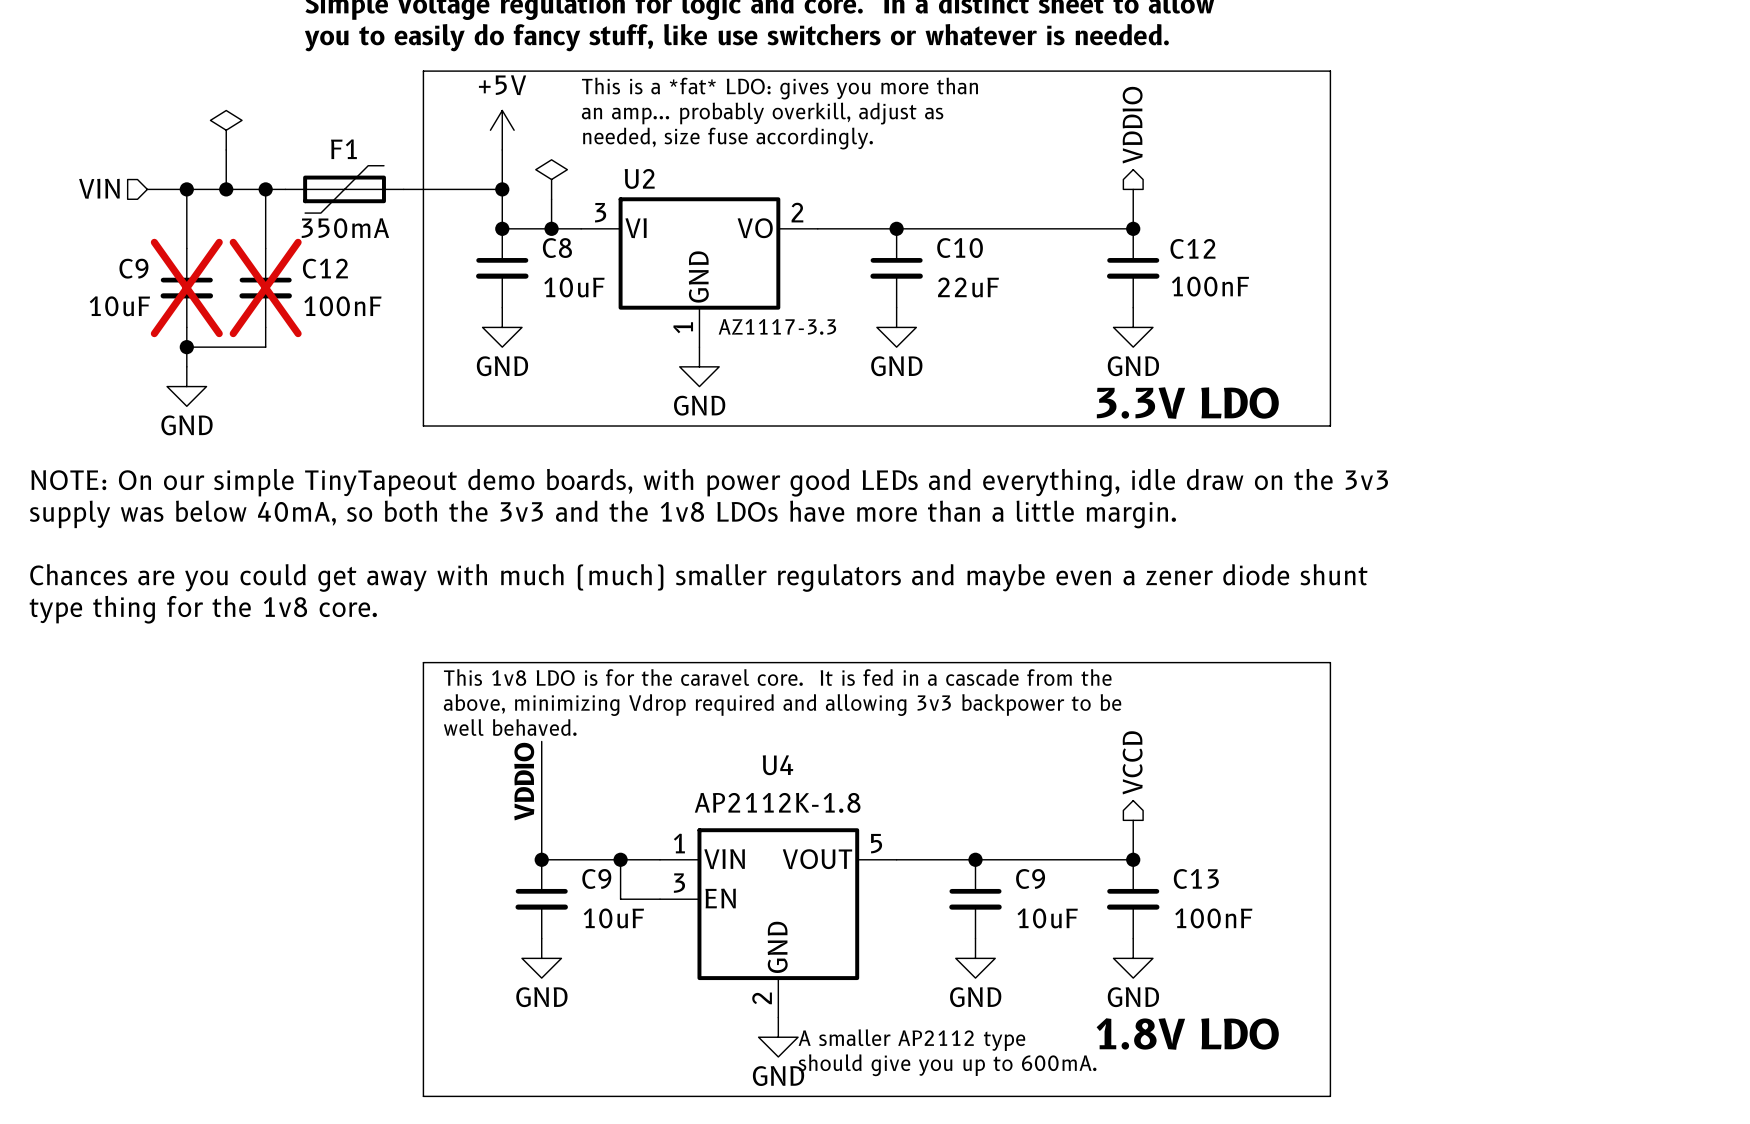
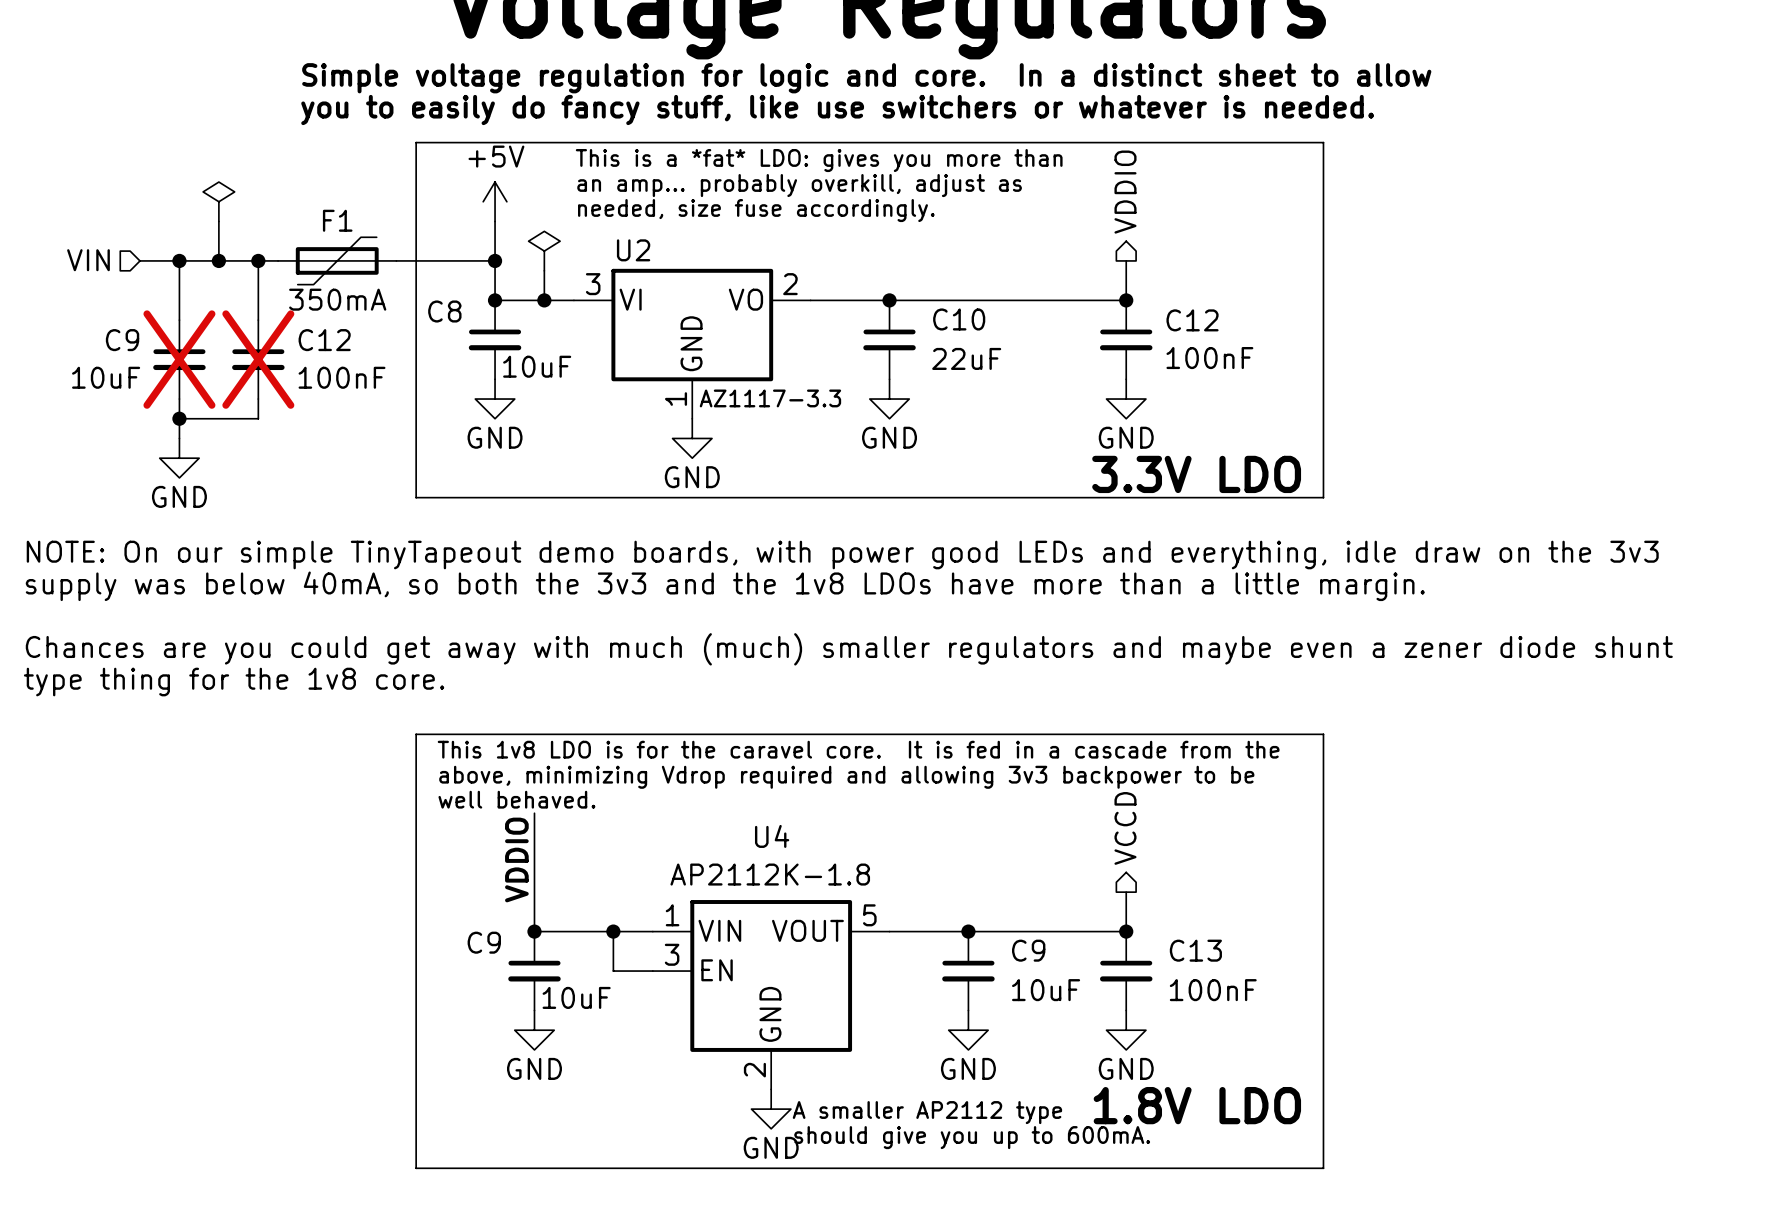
C8 name position: C8 (557, 248) -> C8 (444, 311)
C8 value position: 10uF (574, 287) -> 10uF (537, 366)
C9 name position: C9 (596, 878) -> C9 (484, 942)
C9 value position: 10uF (613, 918) -> 10uF (576, 997)

